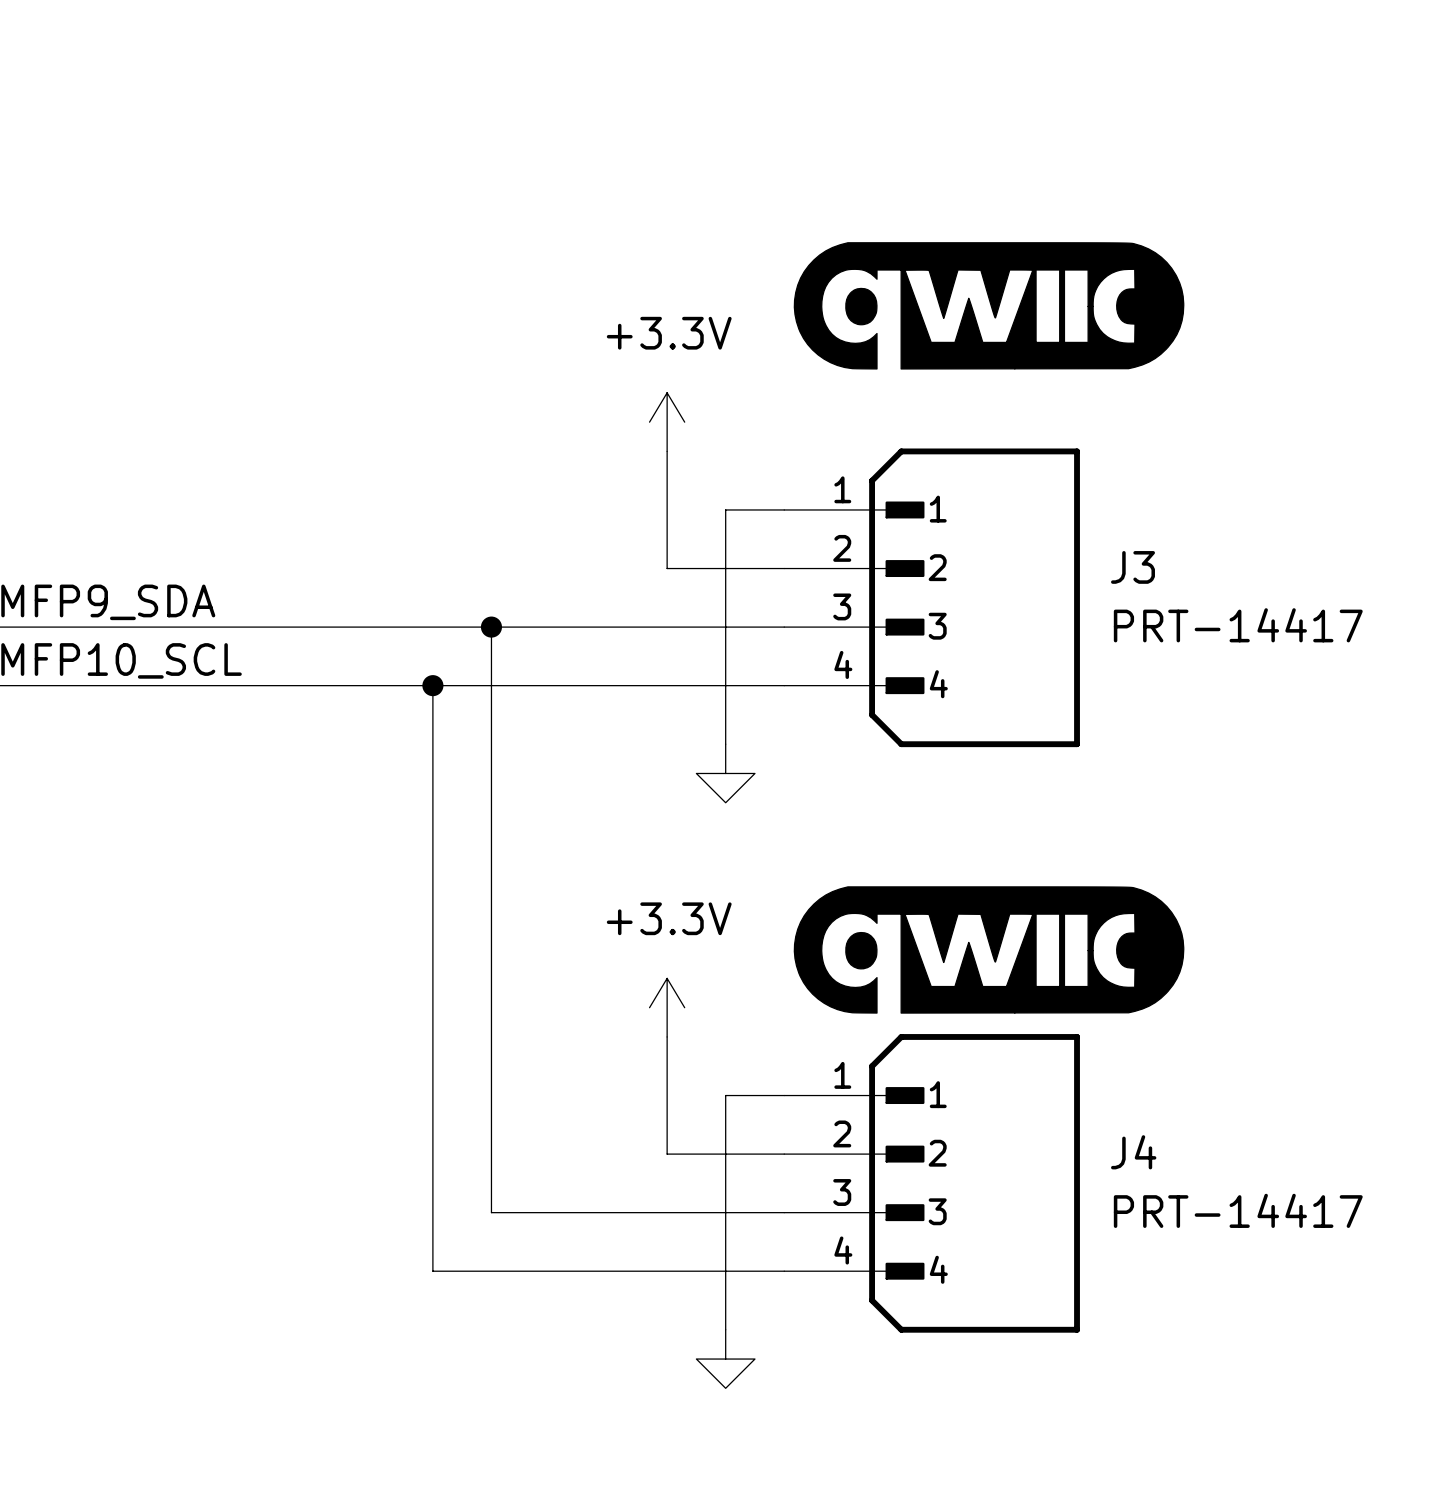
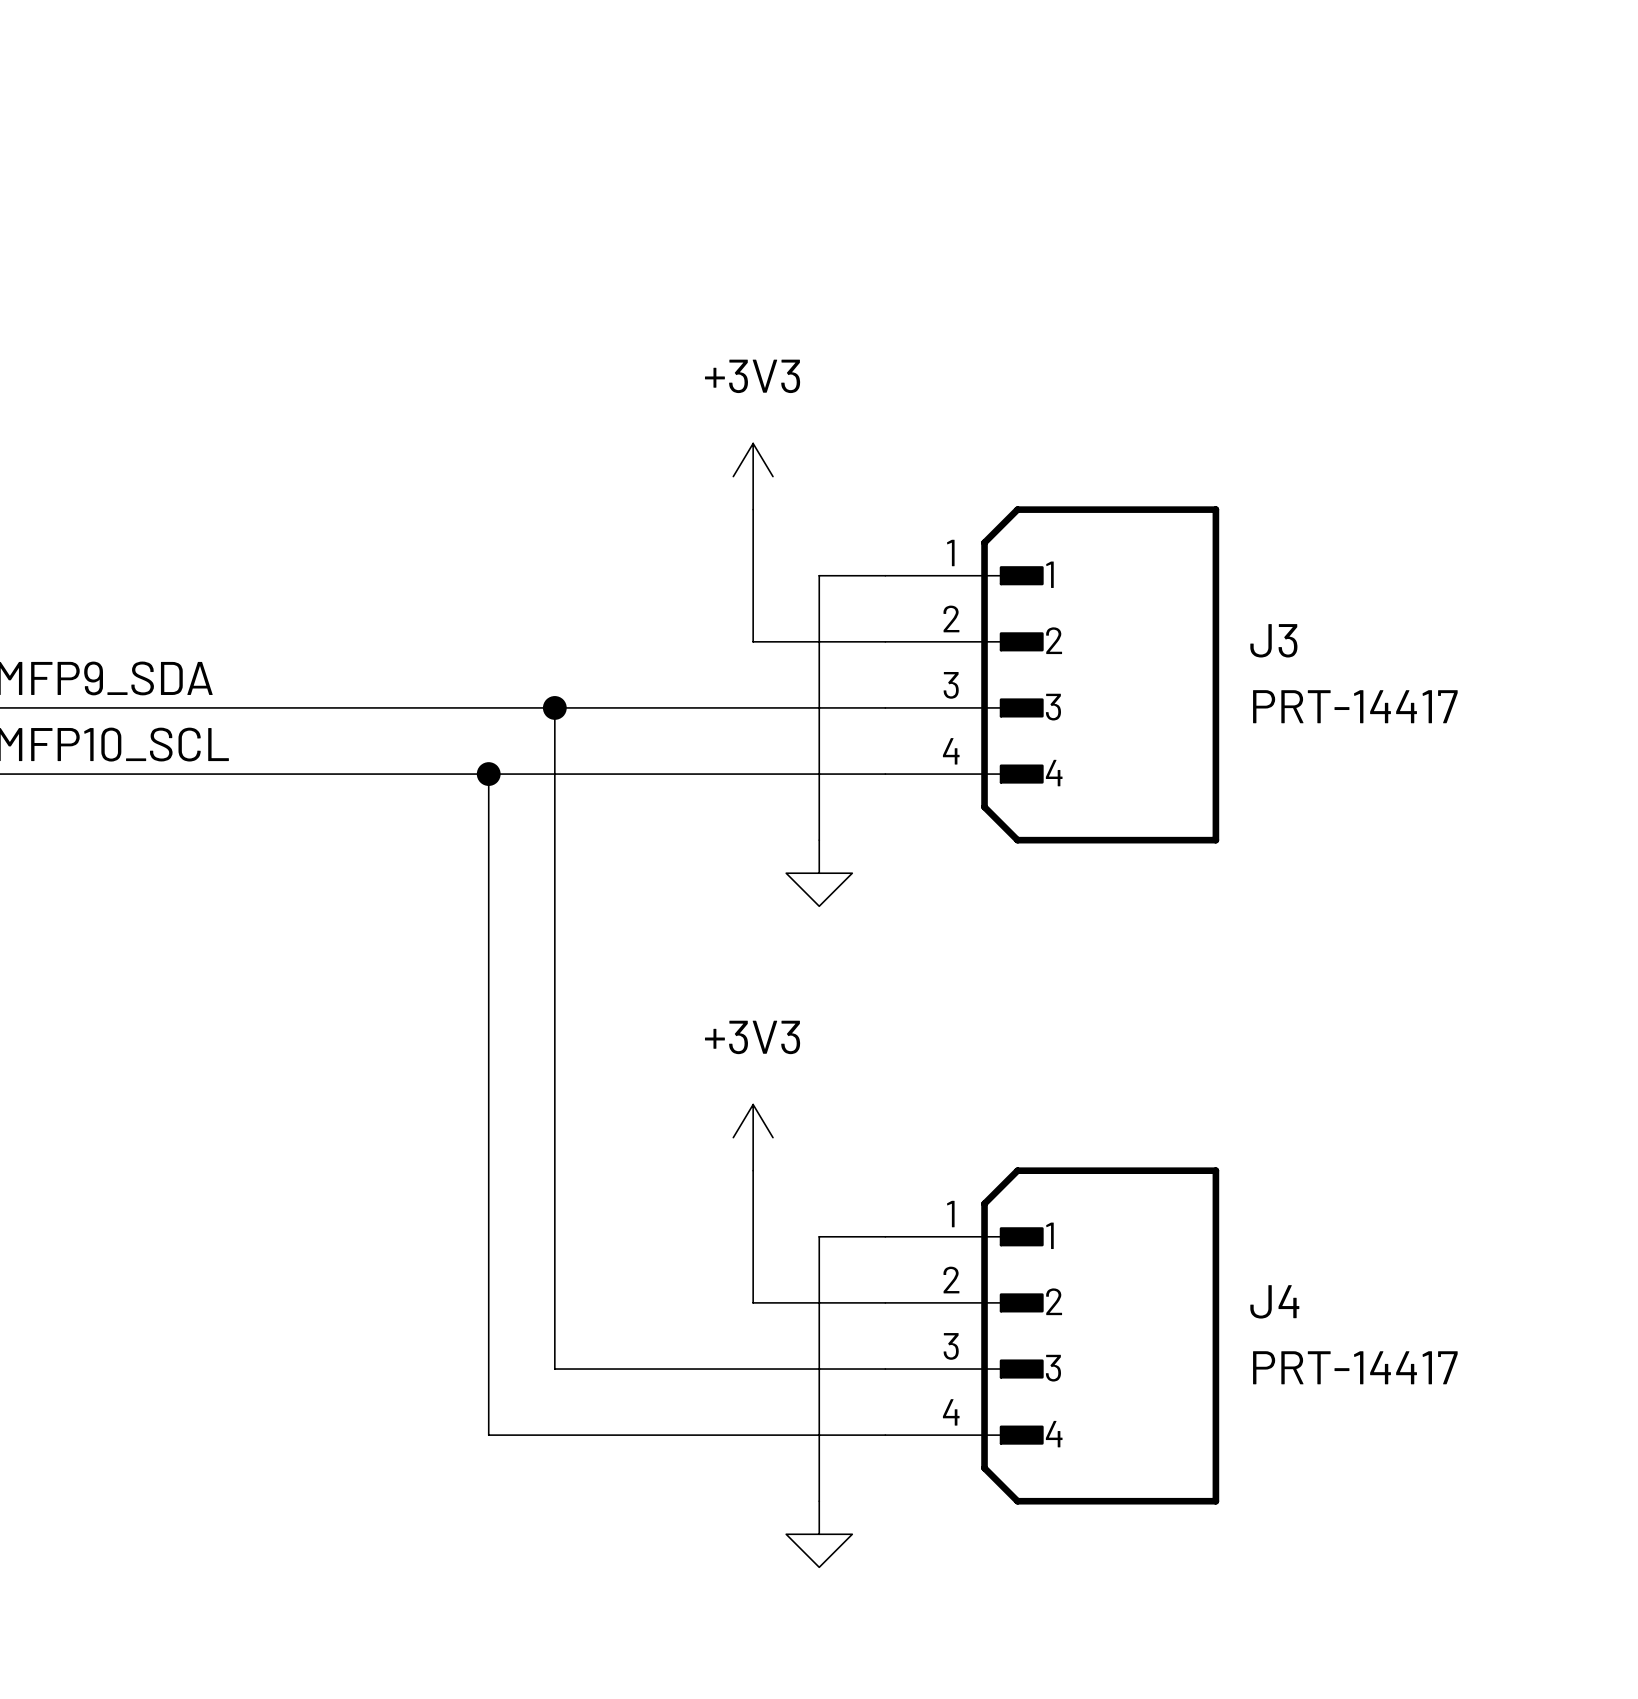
part: (989, 305) -> none
power symbol: +3.3V (667, 422) -> +3V3 (753, 476)
part: (989, 949) -> none
power symbol: +3.3V (667, 1007) -> +3V3 (753, 1137)

